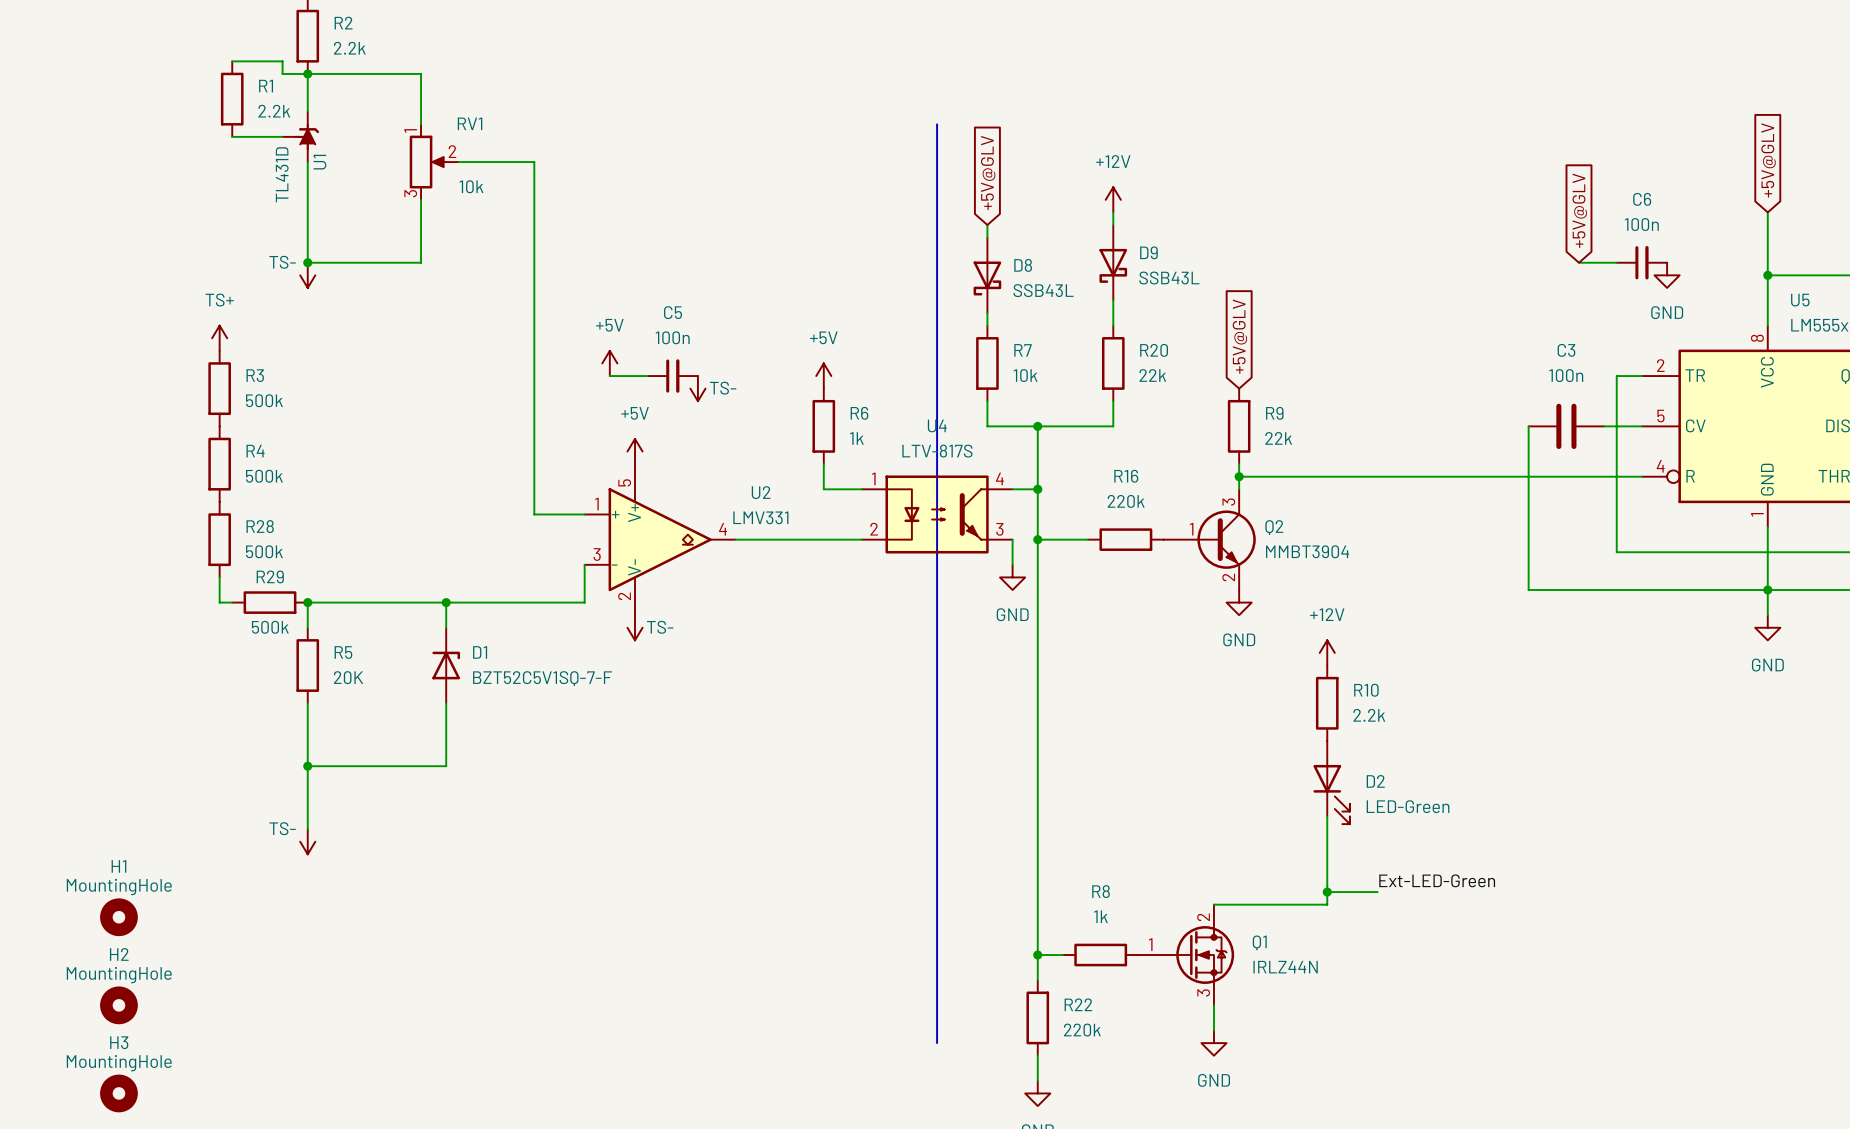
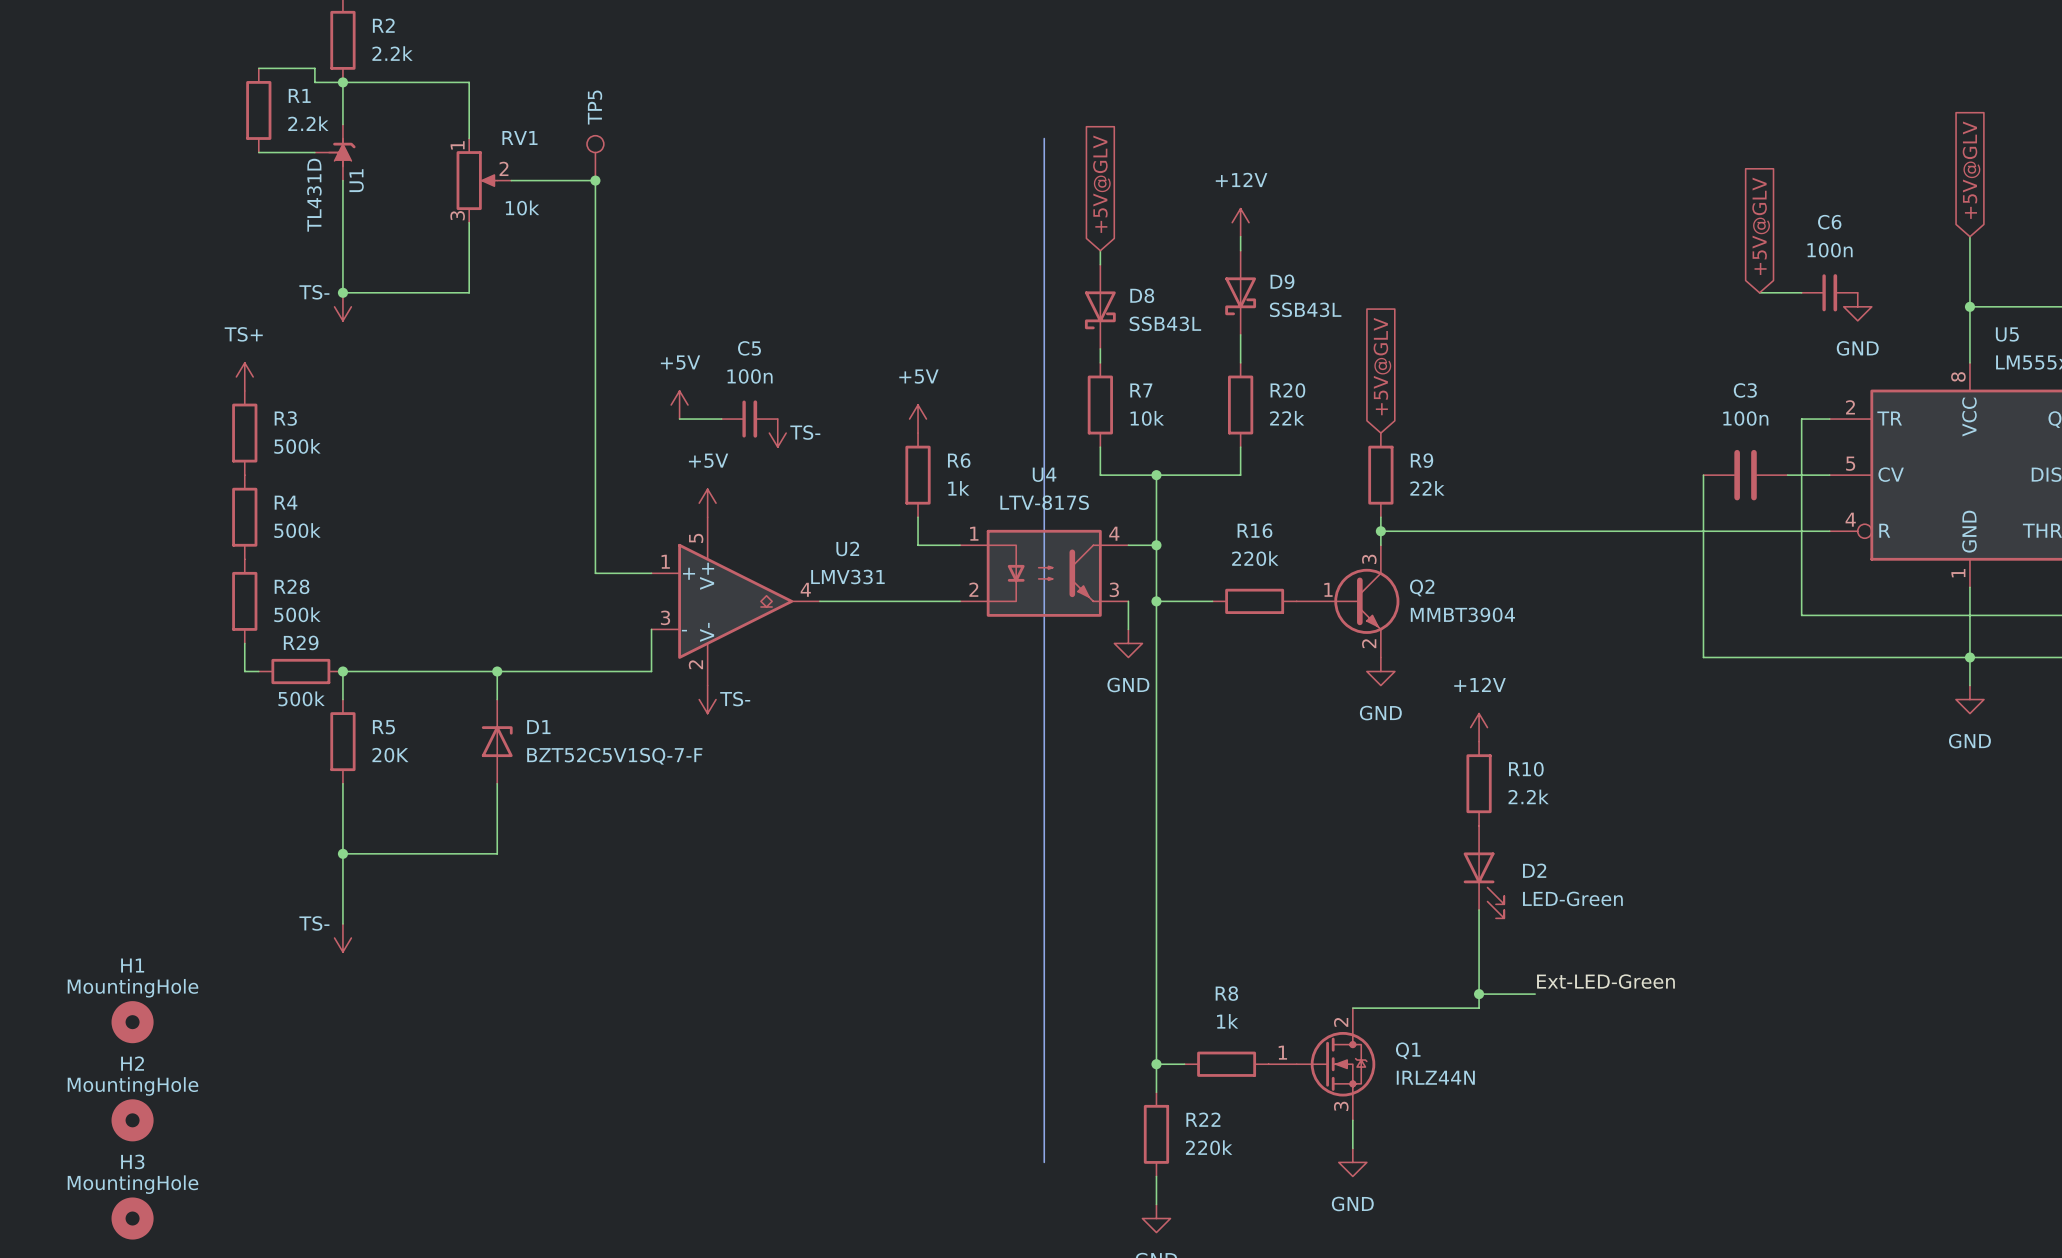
TP5: none -> (595, 158)
junction: none -> (595, 180)

